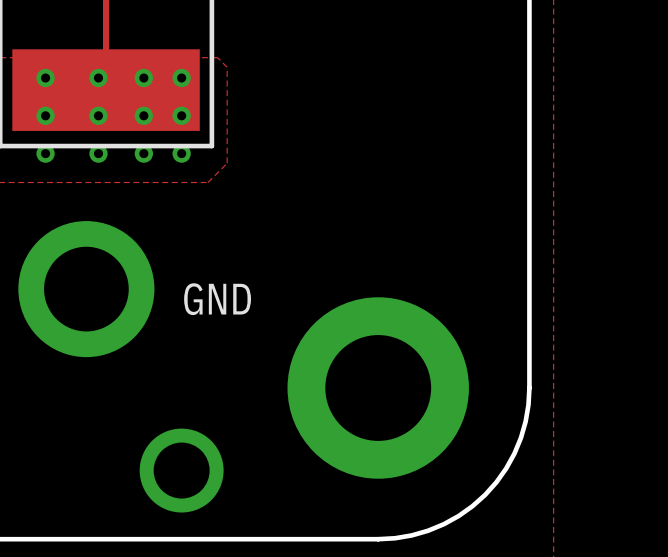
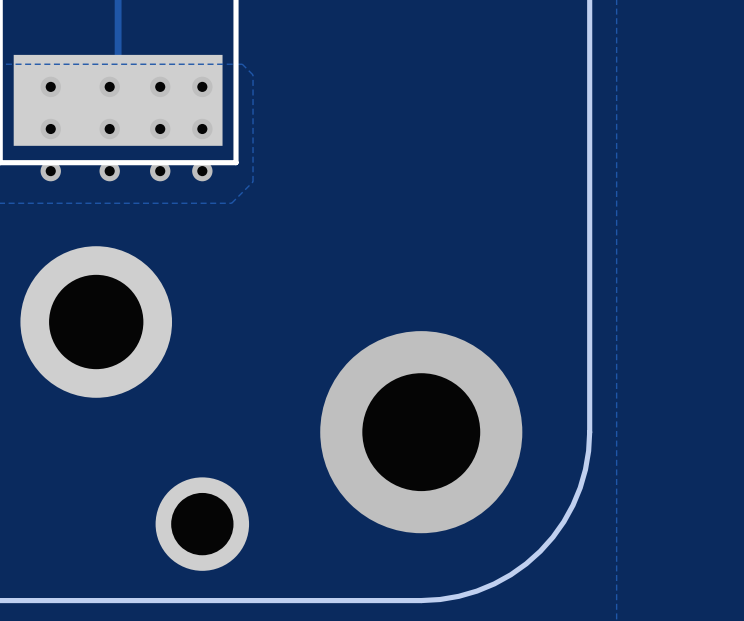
text: GND (217, 299) -> none

